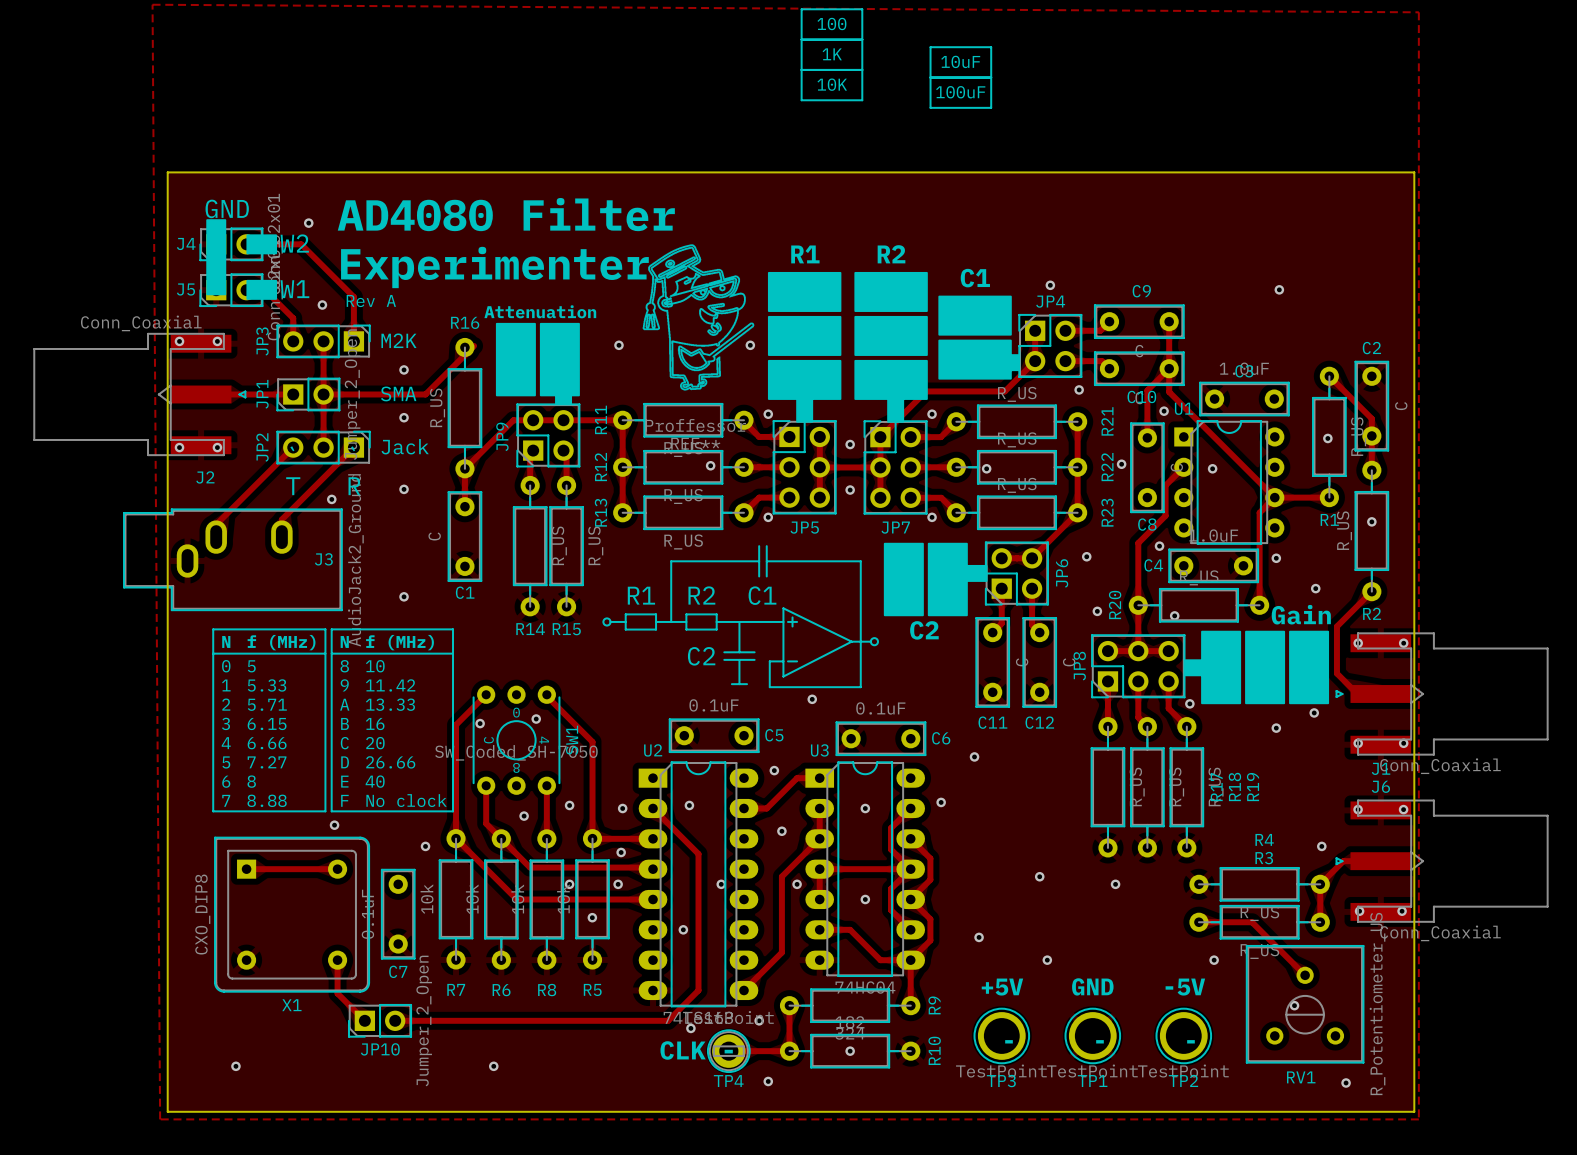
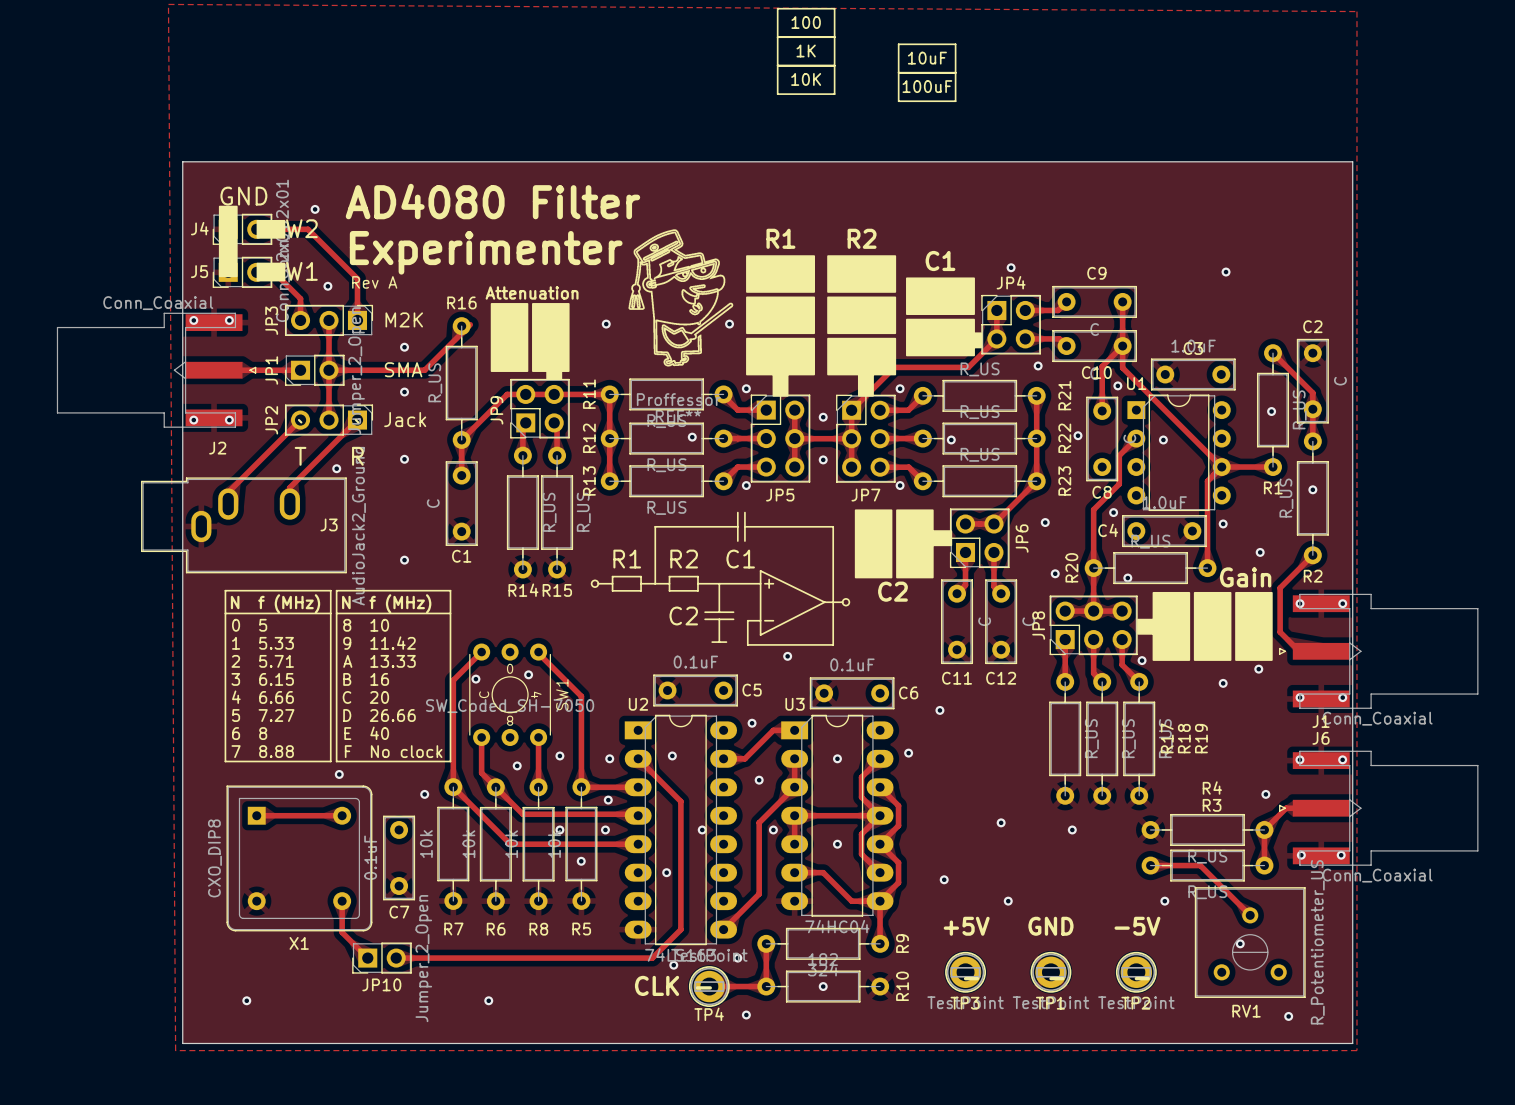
TP3 footprint: [973, 1007, 1030, 1065] -> [945, 951, 987, 993]
TP1 footprint: [1064, 1007, 1121, 1065] -> [1030, 951, 1072, 993]
TP2 footprint: [1155, 1007, 1212, 1065] -> [1115, 951, 1157, 993]

